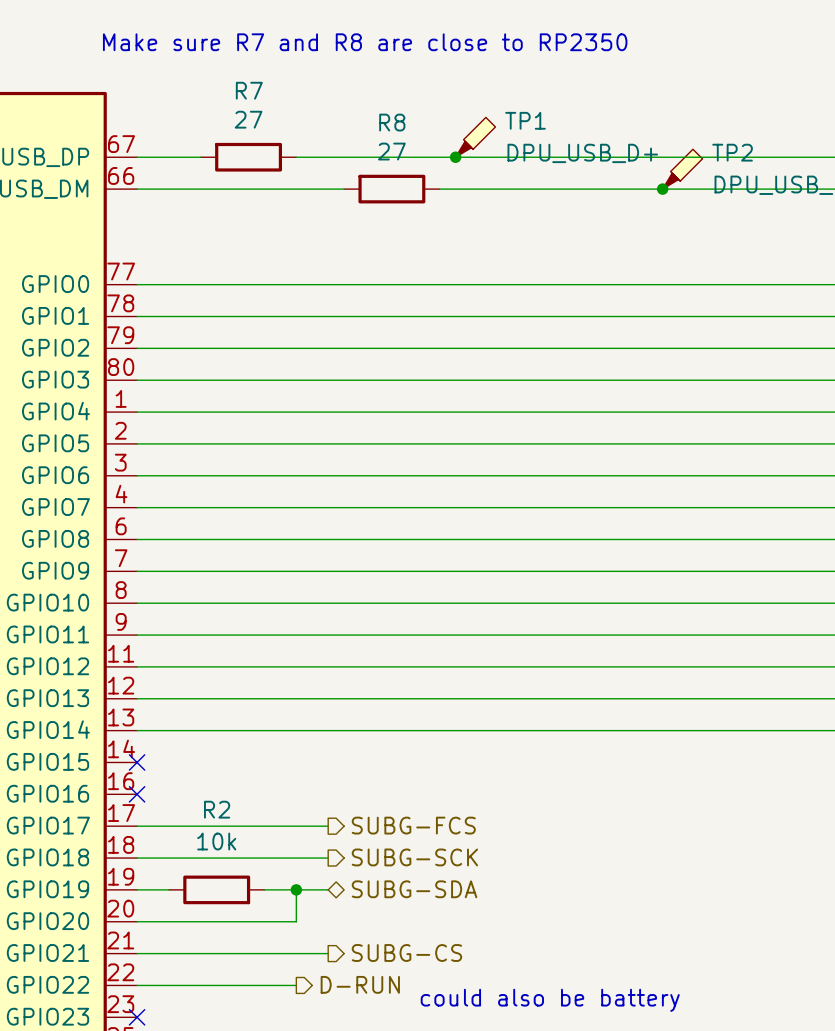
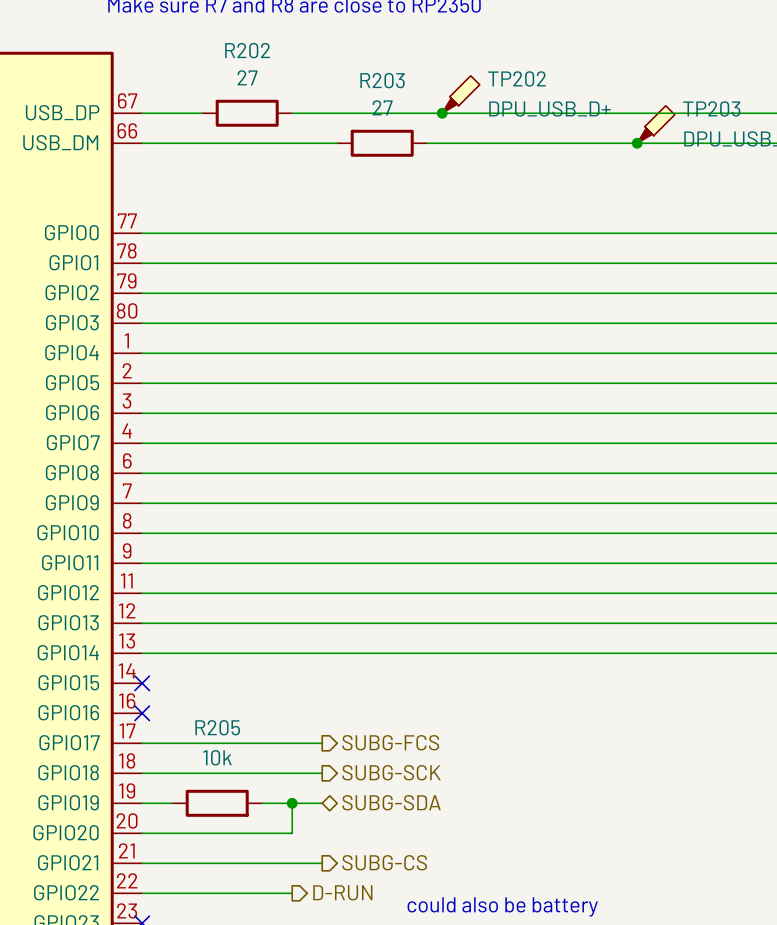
R7 name: R7 (249, 90) -> R202 (247, 50)
TP1 name: TP1 (525, 120) -> TP202 (517, 78)
R8 name: R8 (392, 122) -> R203 (382, 80)
TP2 name: TP2 (732, 152) -> TP203 (711, 108)
R2 name: R2 (217, 809) -> R205 (217, 727)

